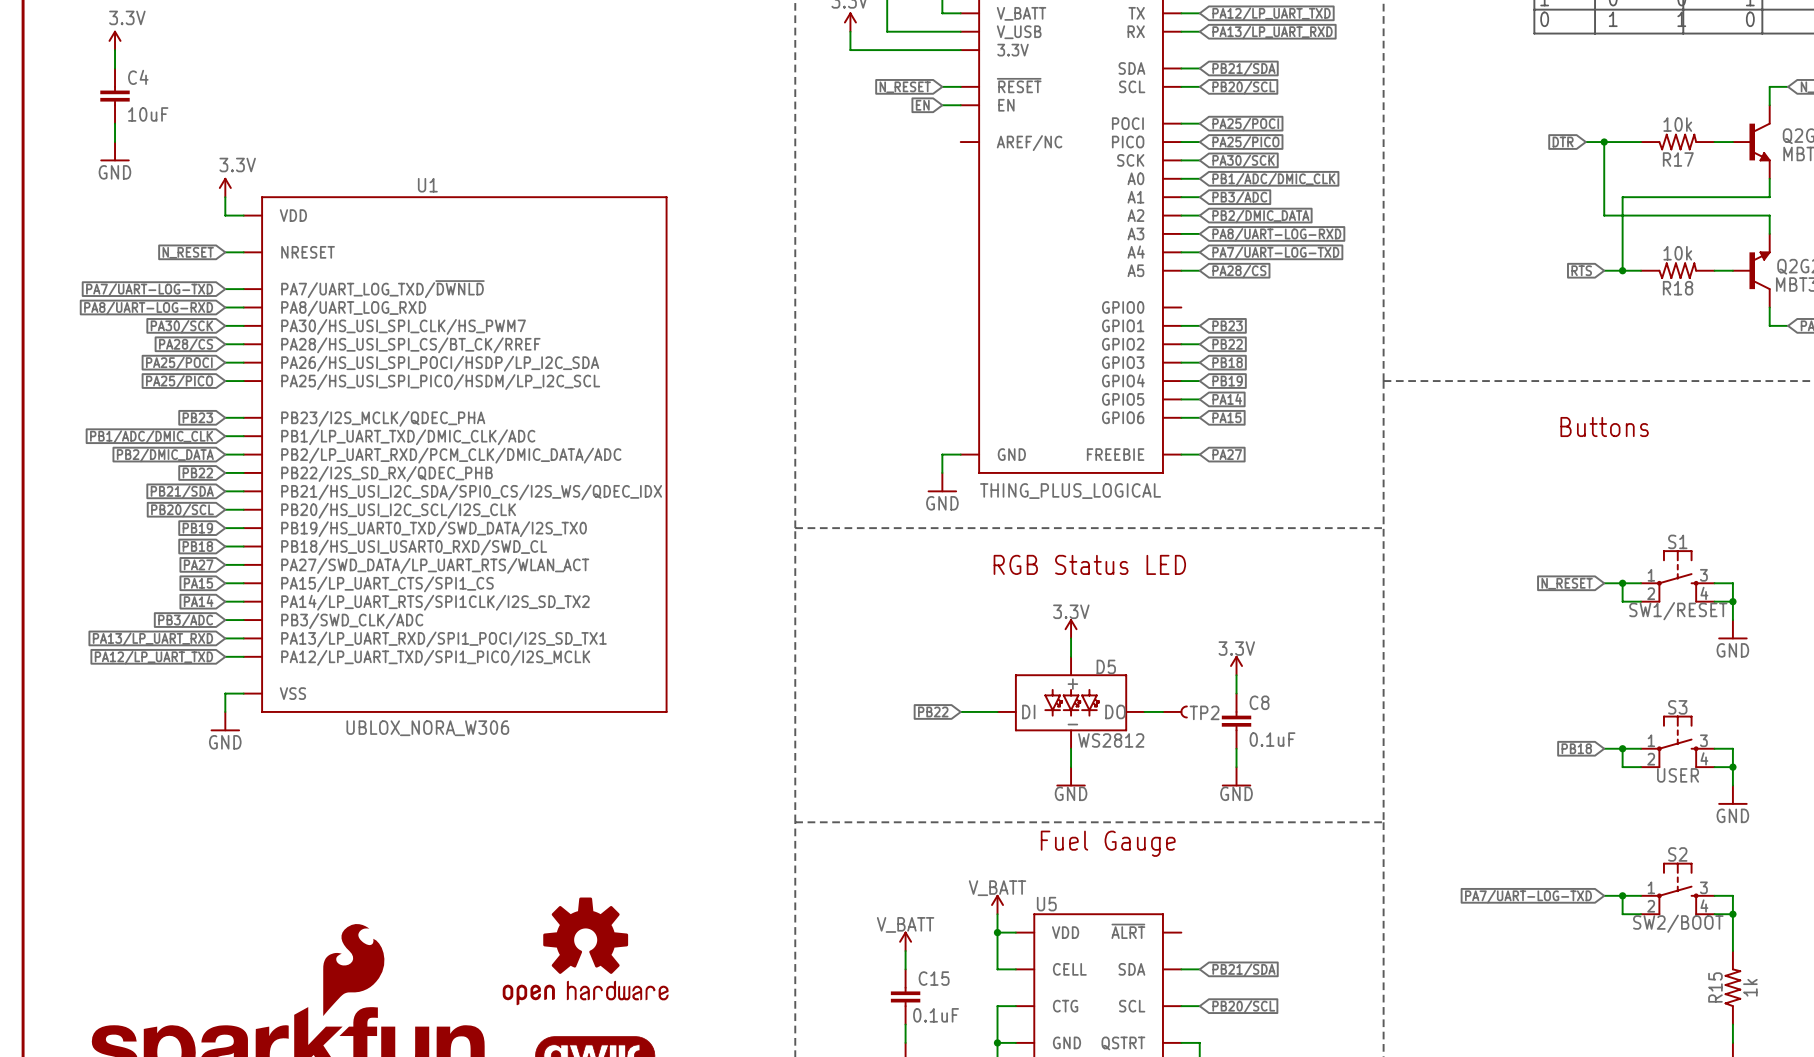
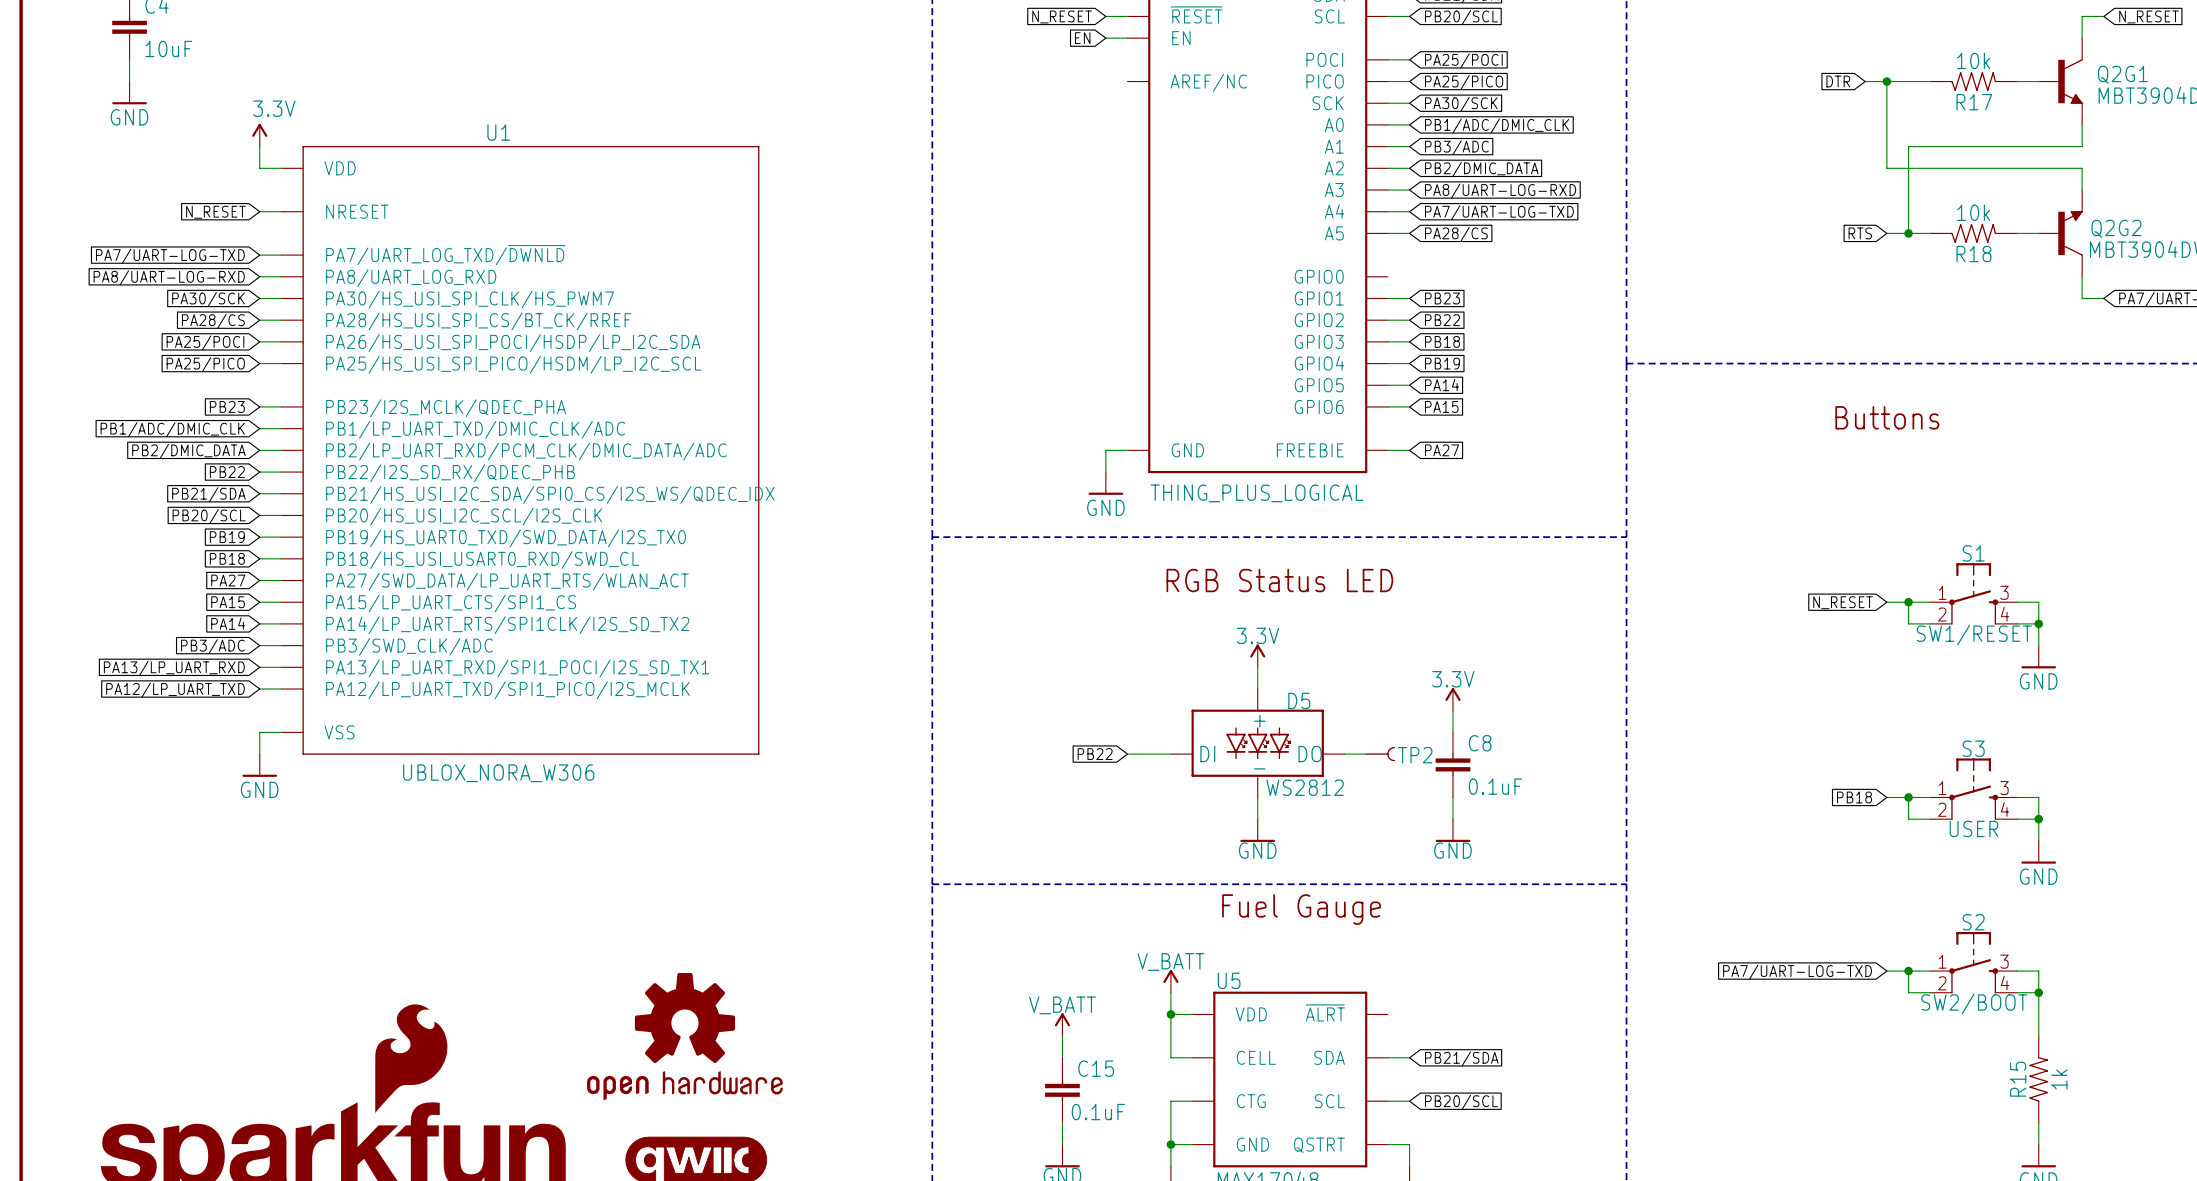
U1 symbol: [243, 196, 668, 713] -> [281, 145, 760, 755]

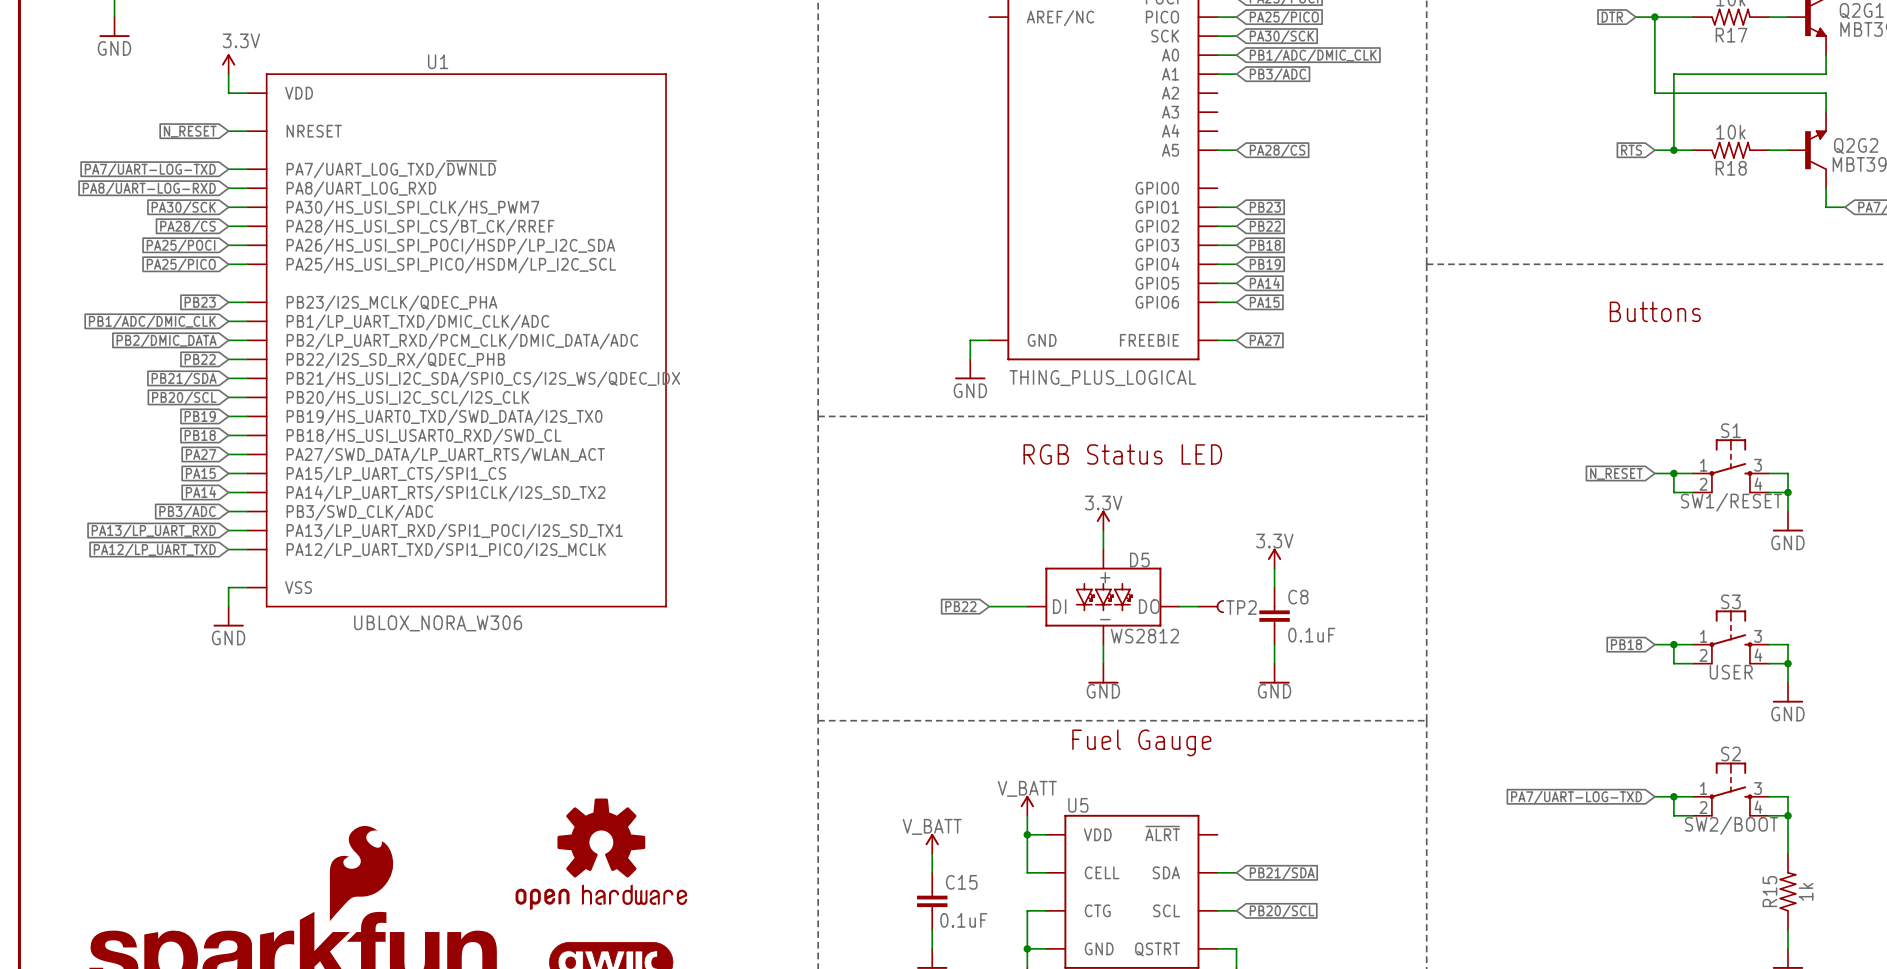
wire: (1387, 168) (1409, 168) -> none
global label: PB2/DMIC_DATA (1481, 169) -> none
wire: (1387, 190) (1409, 190) -> none
global label: PA8/UART-LOG-RXD (1500, 191) -> none
wire: (1387, 211) (1409, 211) -> none
global label: PA7/UART-LOG-TXD (1499, 212) -> none

